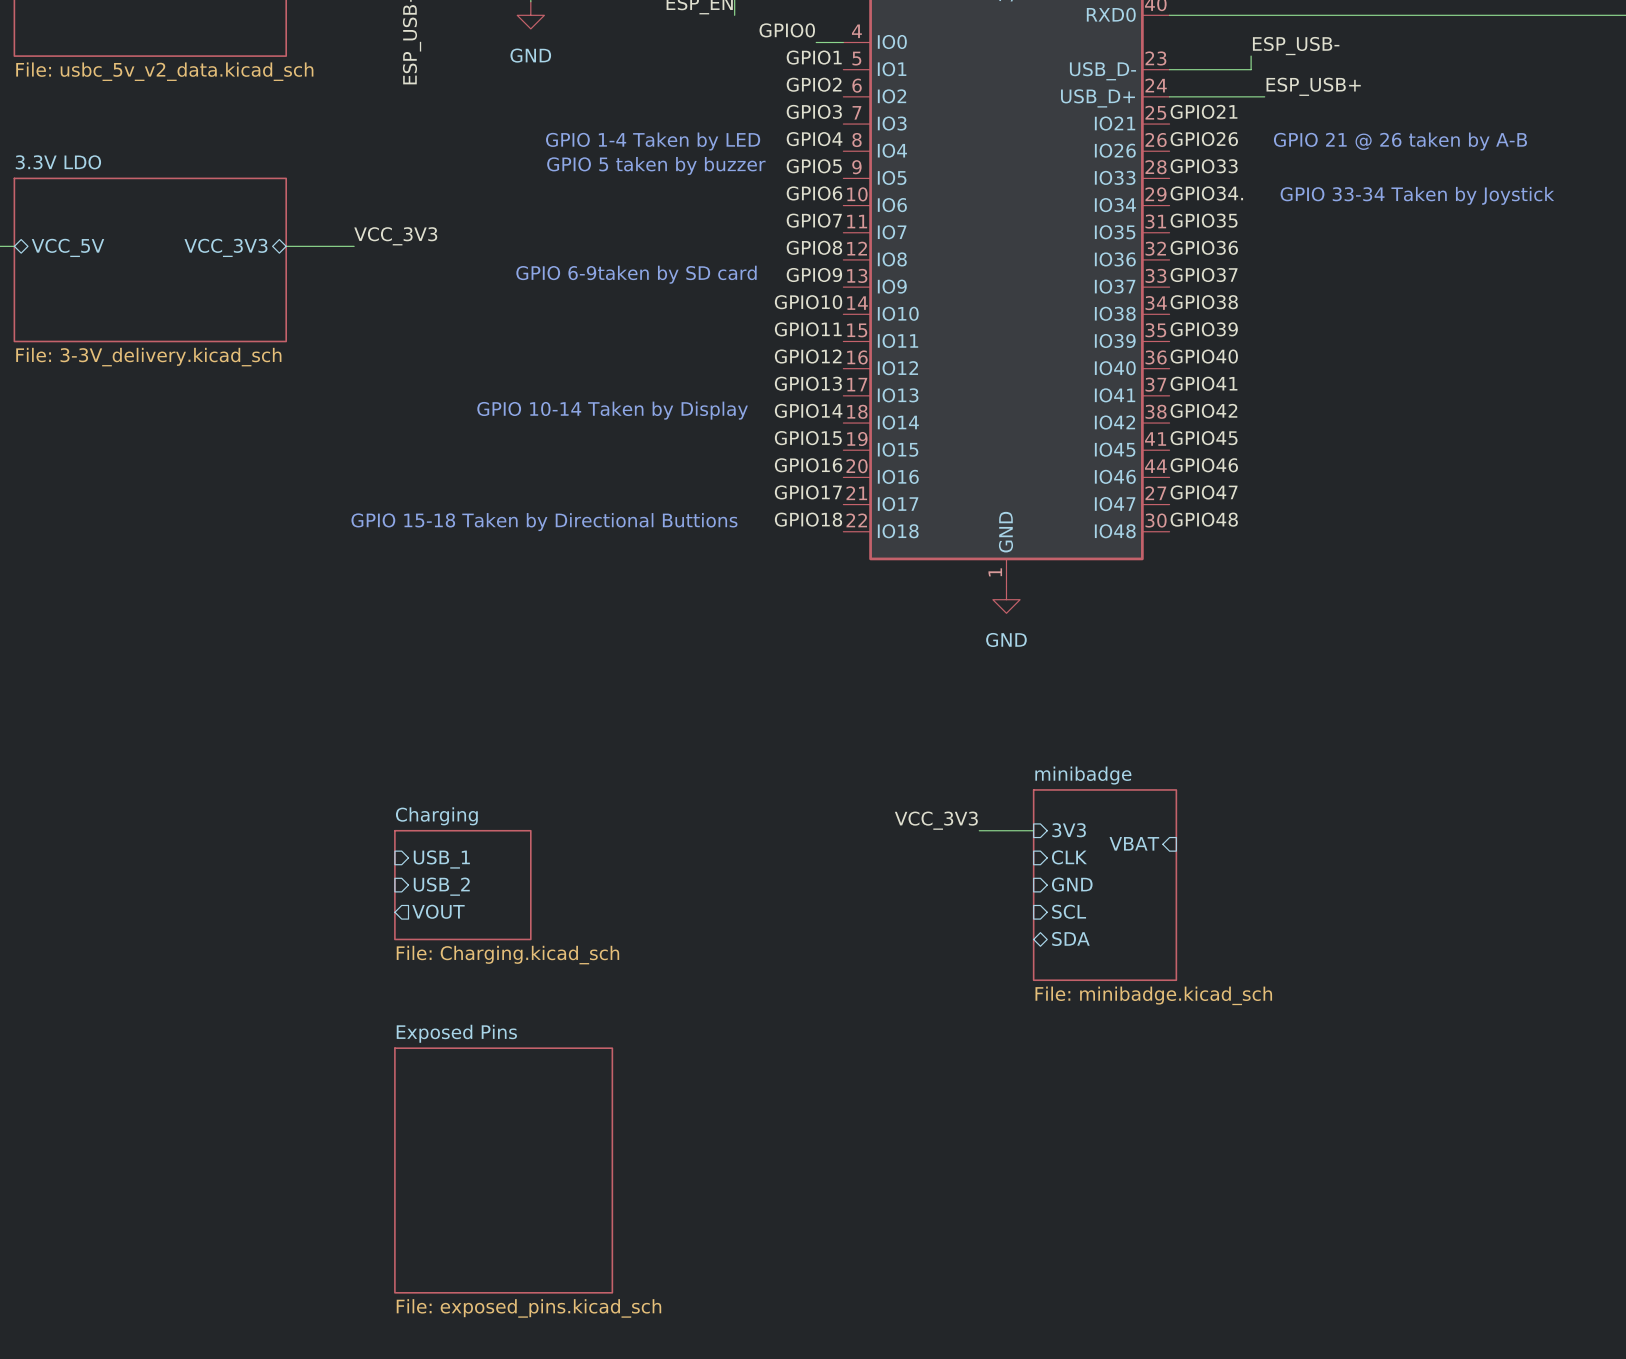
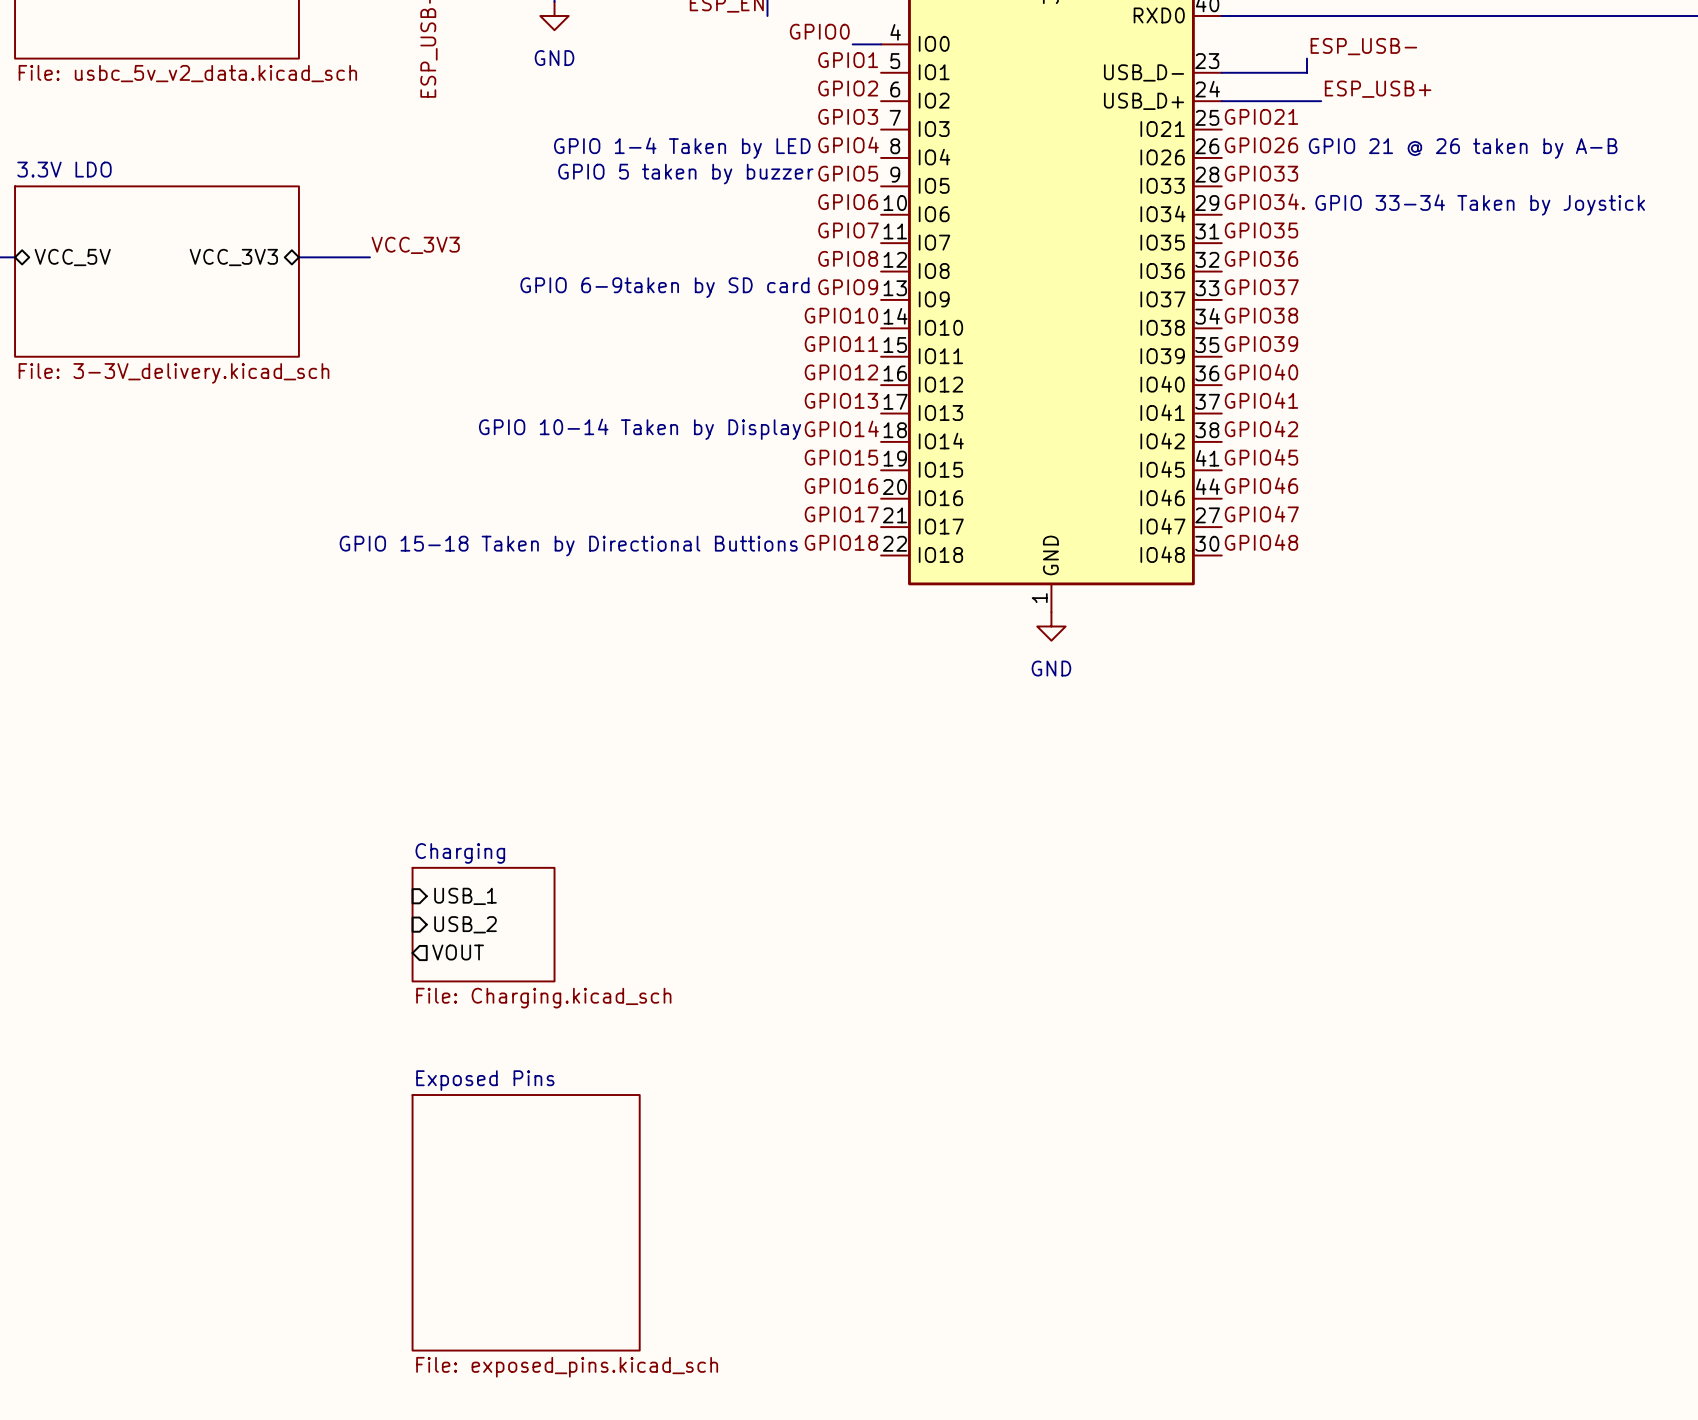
label: VCC_3V3 (936, 820) -> none
wire: (979, 830) (1033, 830) -> none
sheet pin: 3V3 (1069, 830) -> none
sheet pin: VBAT (1134, 843) -> none
sheet pin: CLK (1069, 857) -> none
sheet pin: GND (1072, 884) -> none
sheet minibadge: File: minibadge.kicad_sch (1105, 885) -> none
sheet pin: SCL (1069, 911) -> none
sheet pin: SDA (1070, 938) -> none

